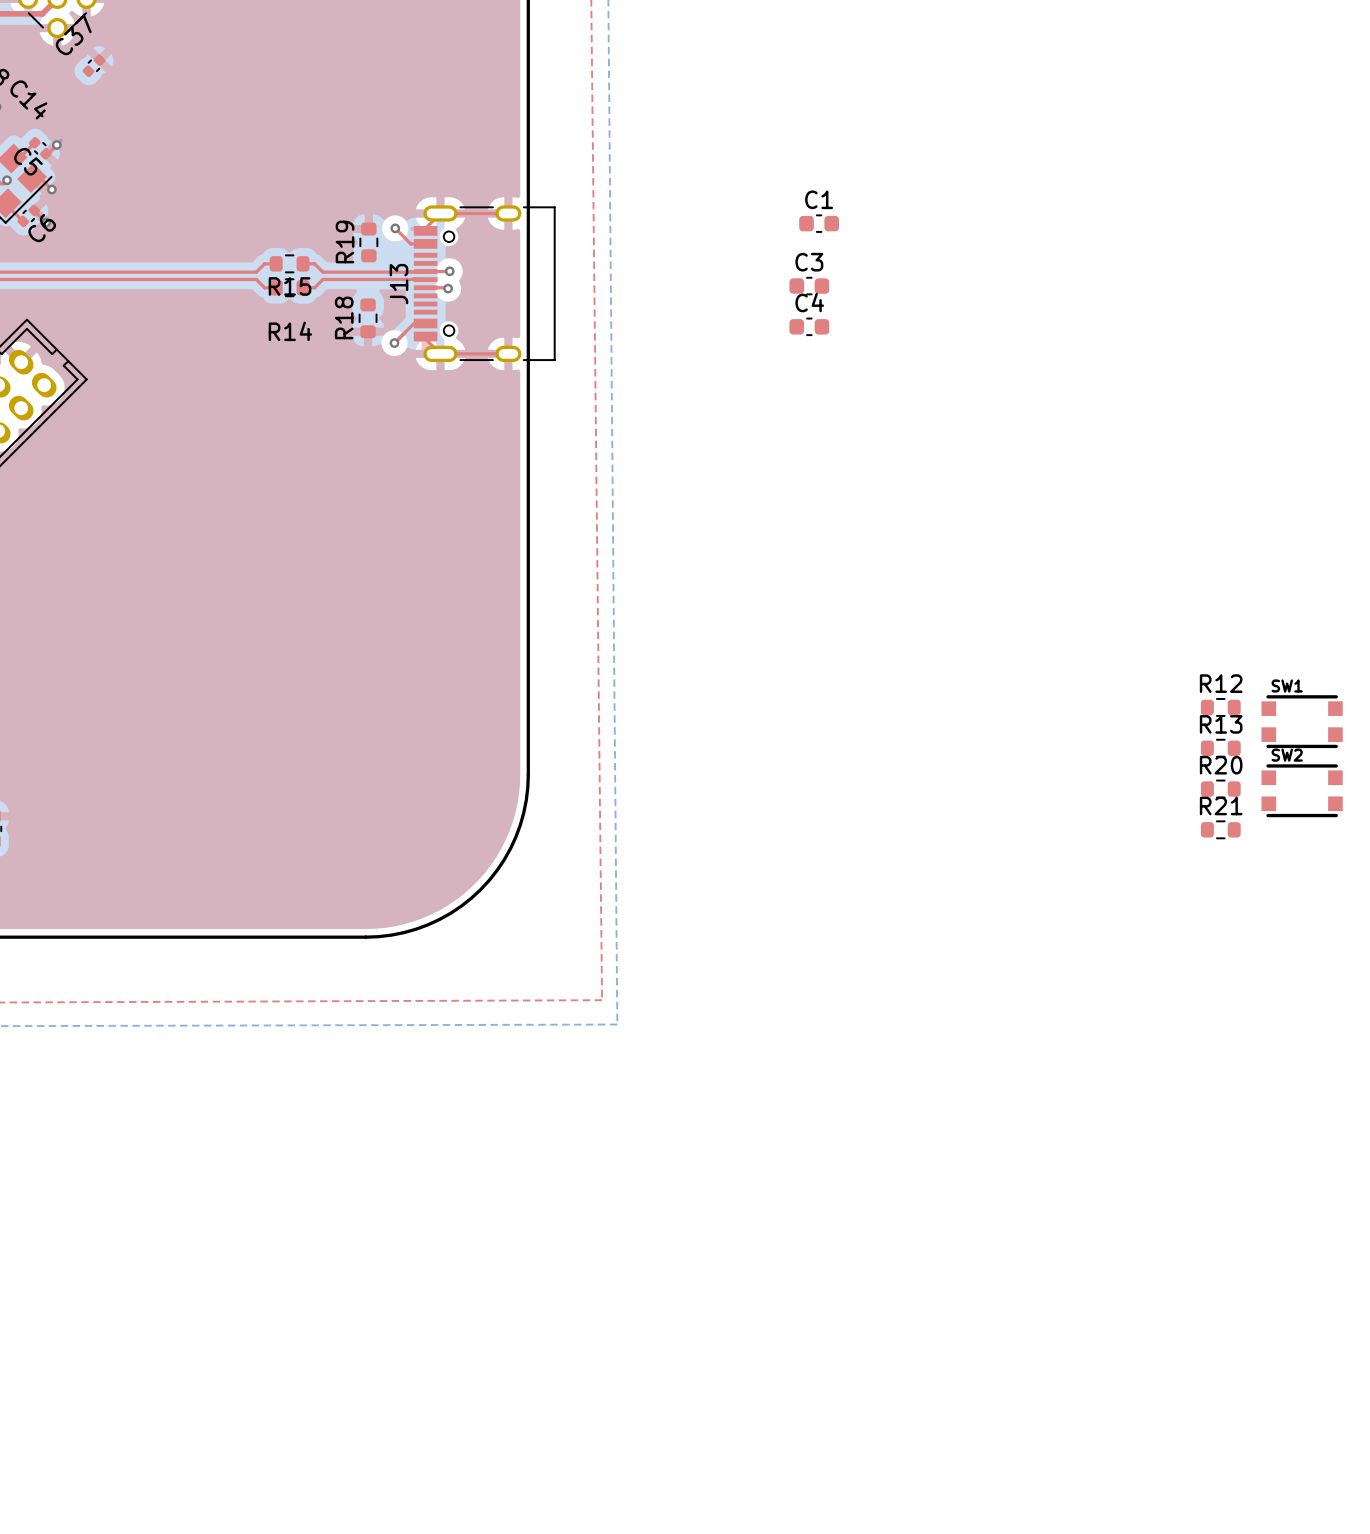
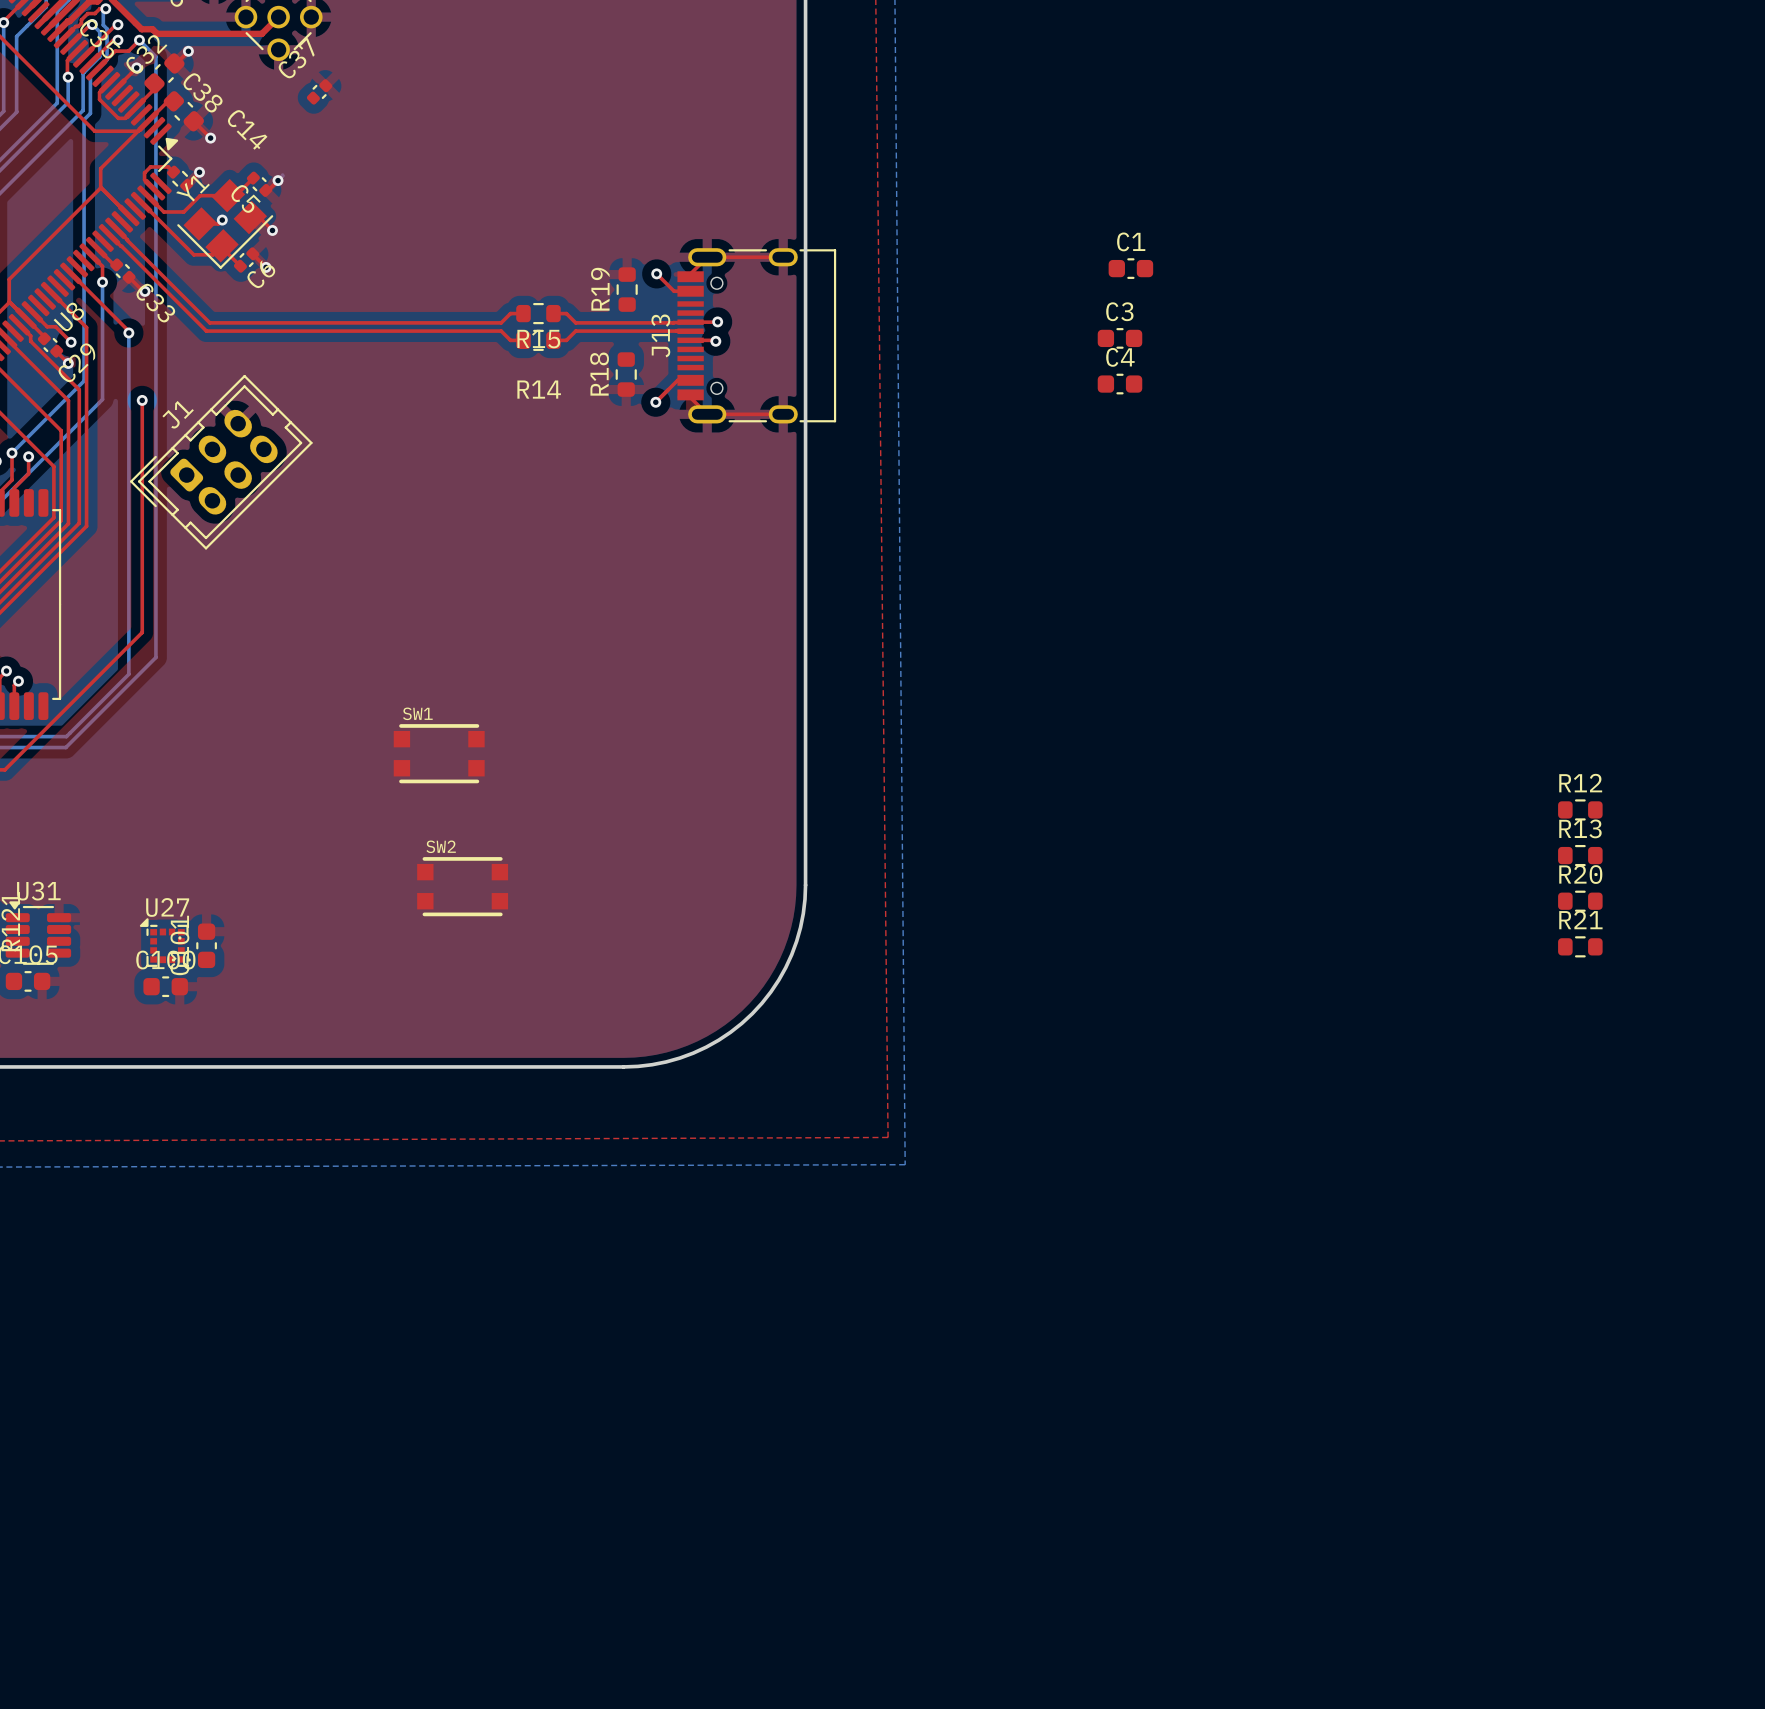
SW1 position: (1302, 721) -> (439, 753)
SW2 position: (1302, 790) -> (462, 886)

